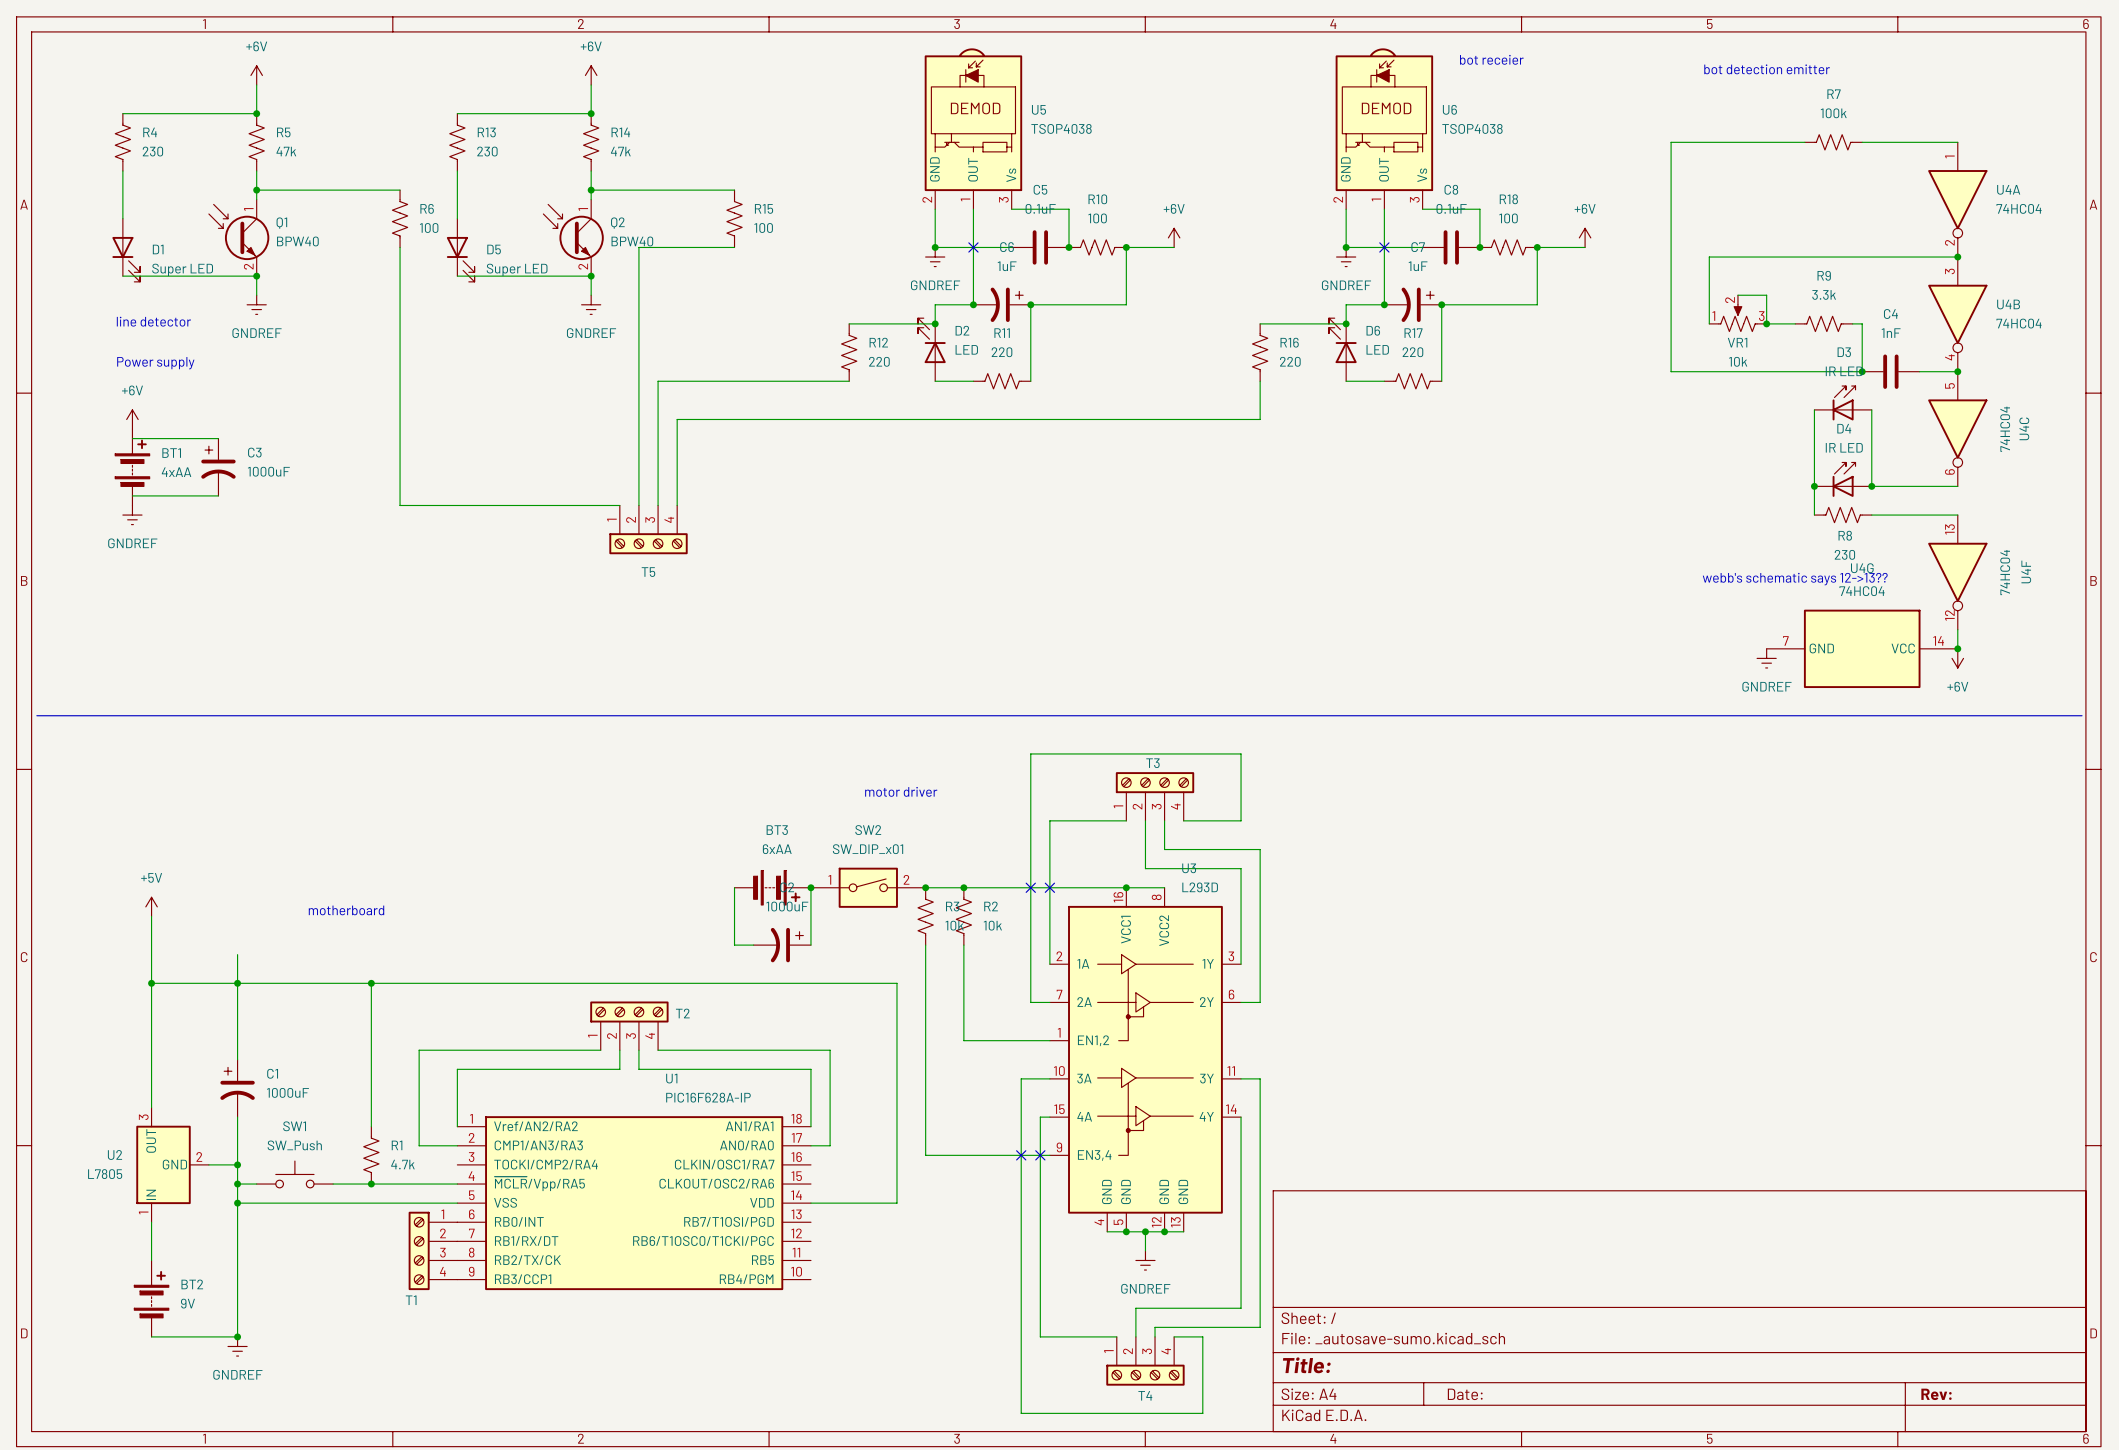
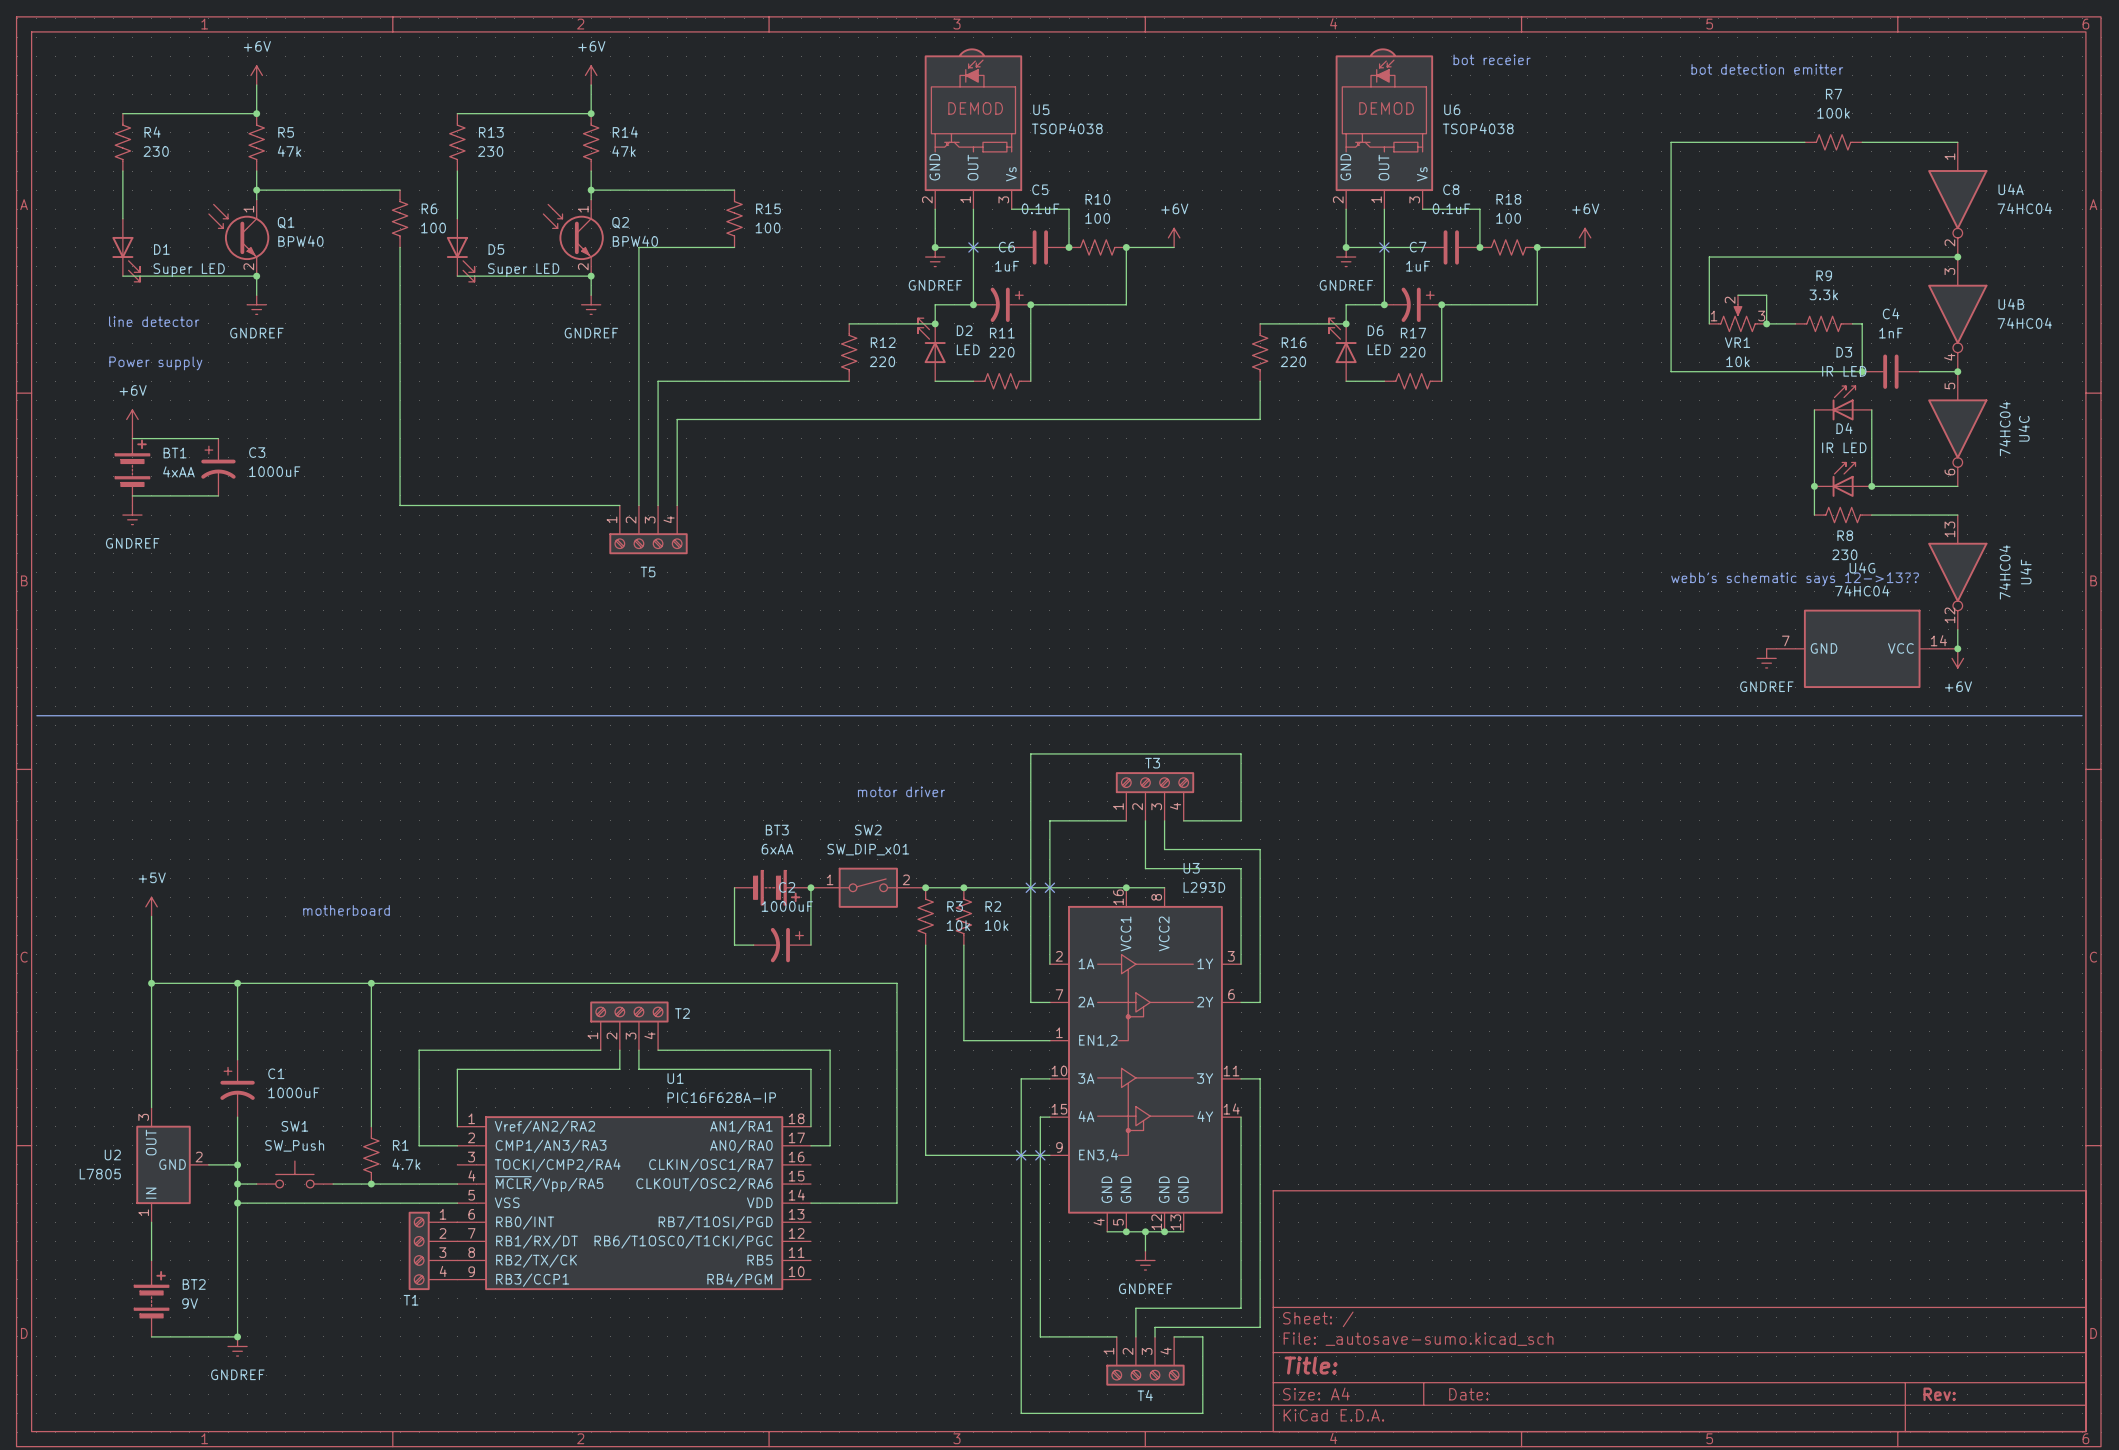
wire: (237, 954) (237, 983) -> none

